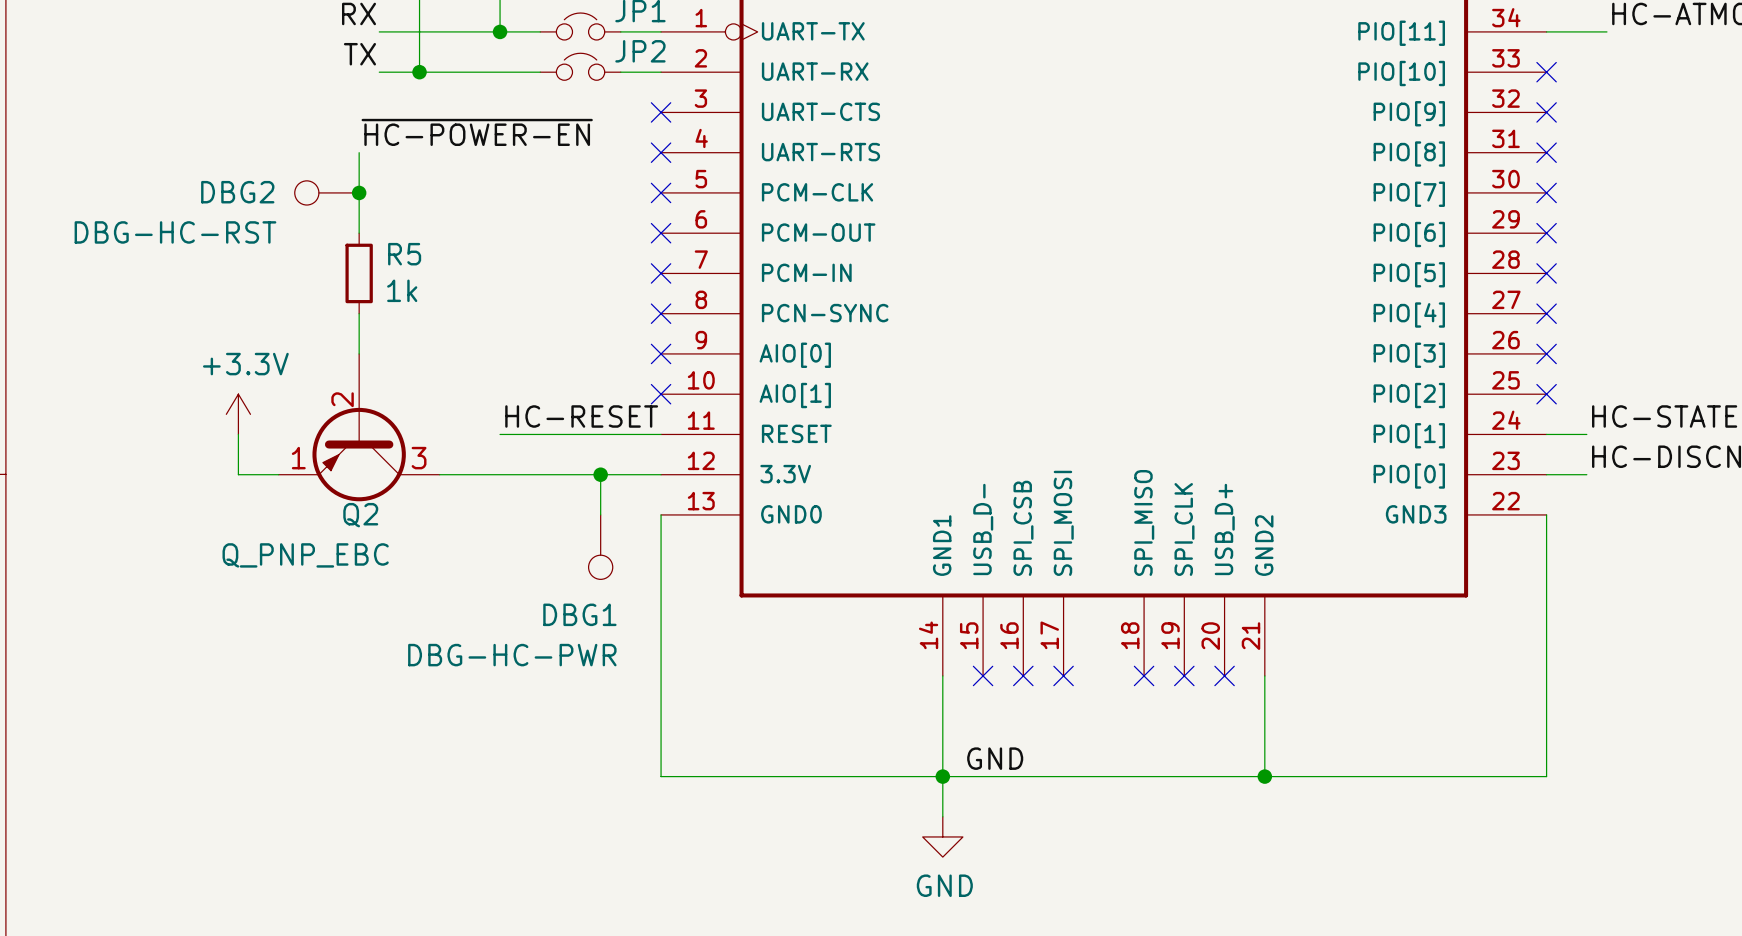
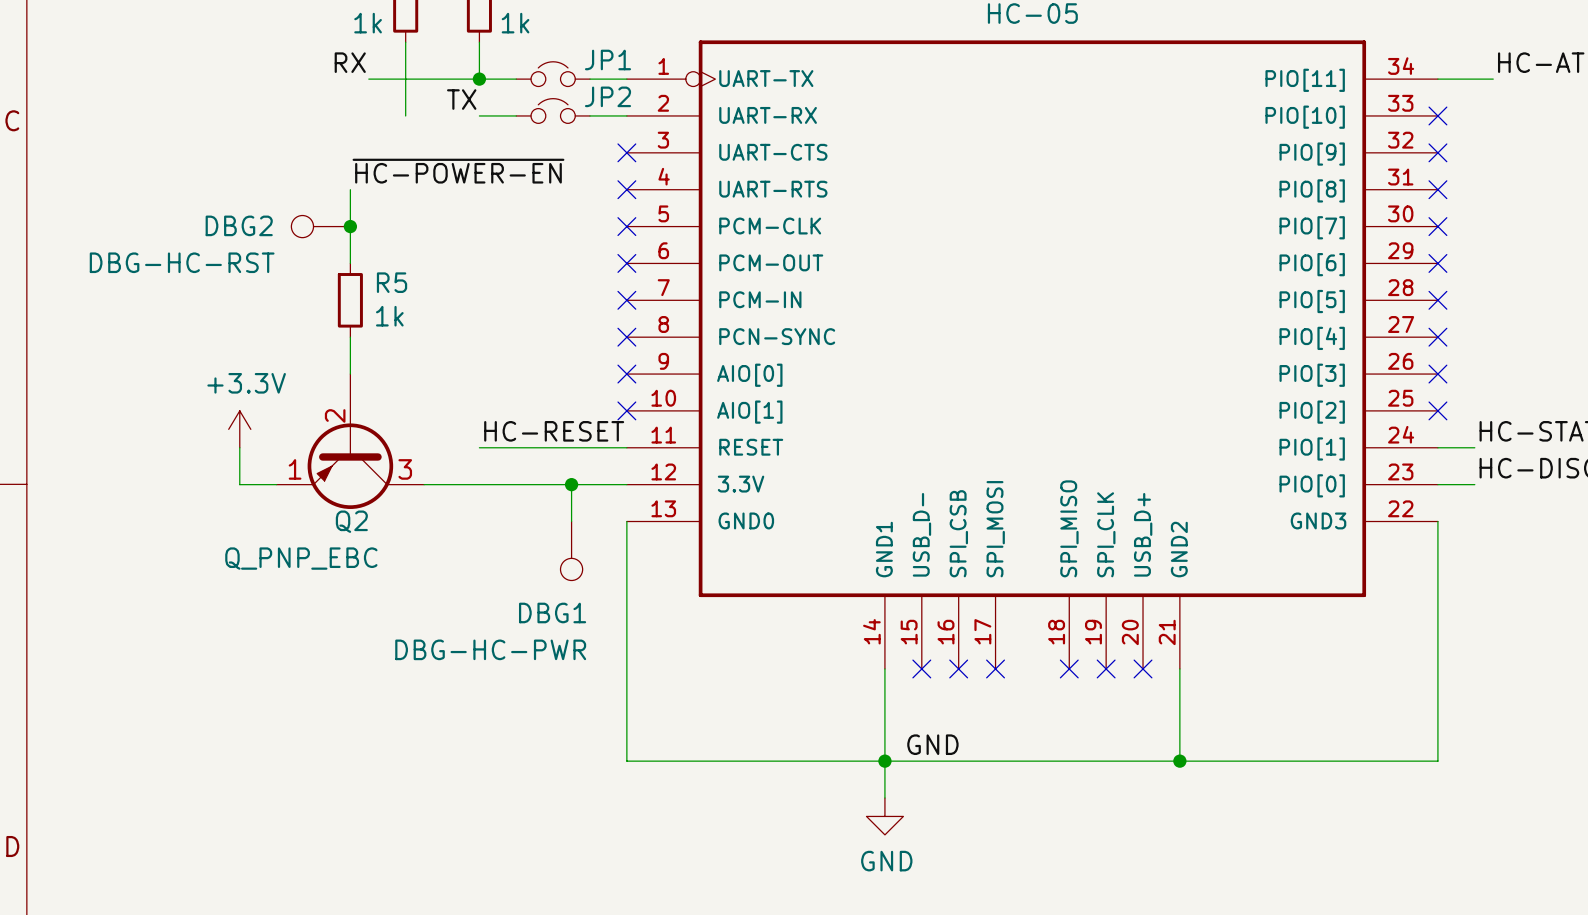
label position: TX (359, 54) -> TX (461, 99)
wire: (379, 72) (500, 72) -> none
junction: (419, 72) -> none

